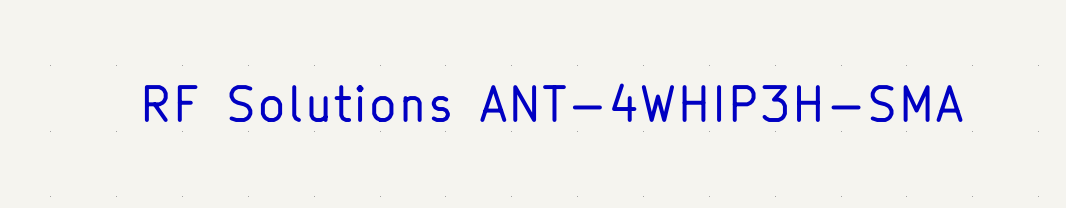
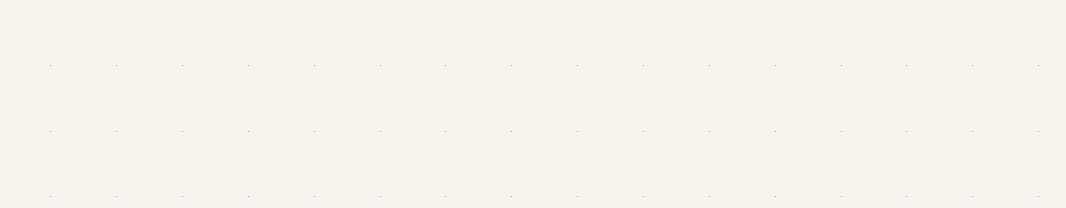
text: RF Solutions ANT-4WHIP3H-SMA (553, 102) -> none

